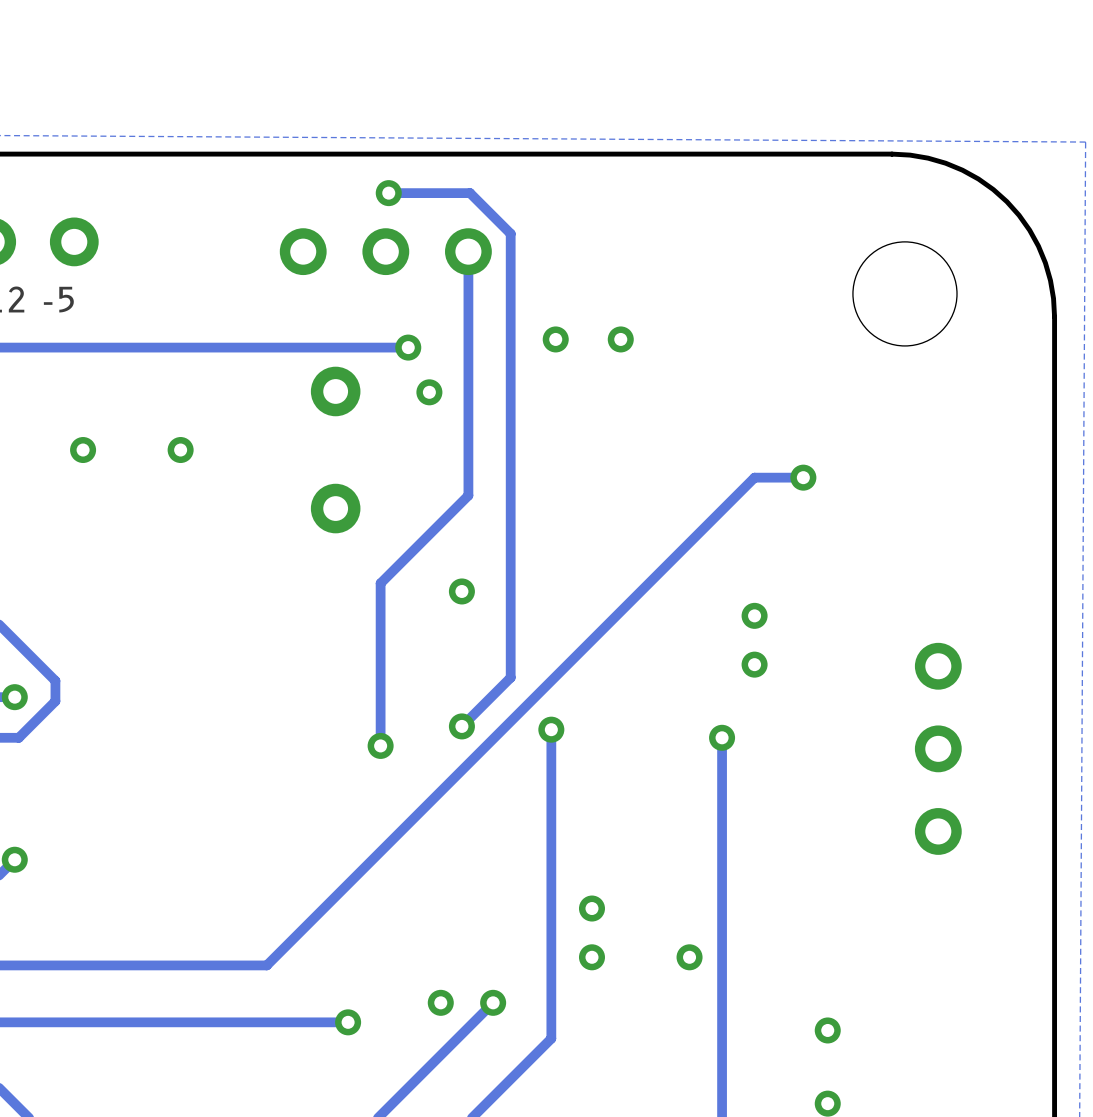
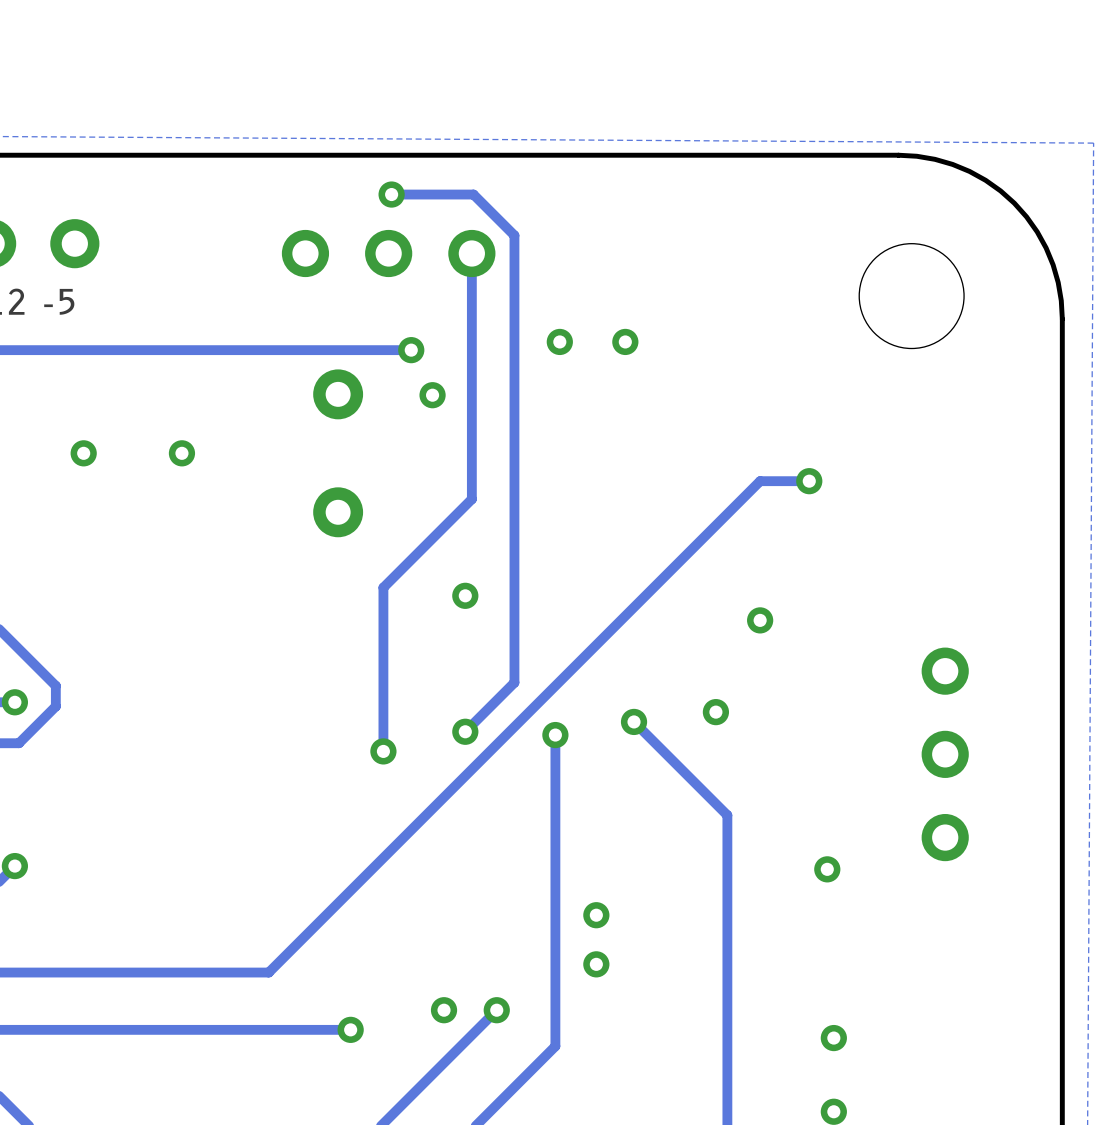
via: (754, 664) -> none
via: none -> (715, 712)
via: none -> (634, 721)
track: (722, 737) (722, 809) -> (634, 721) (727, 815)
via: (722, 737) -> none
via: none -> (827, 869)
via: (689, 957) -> none

